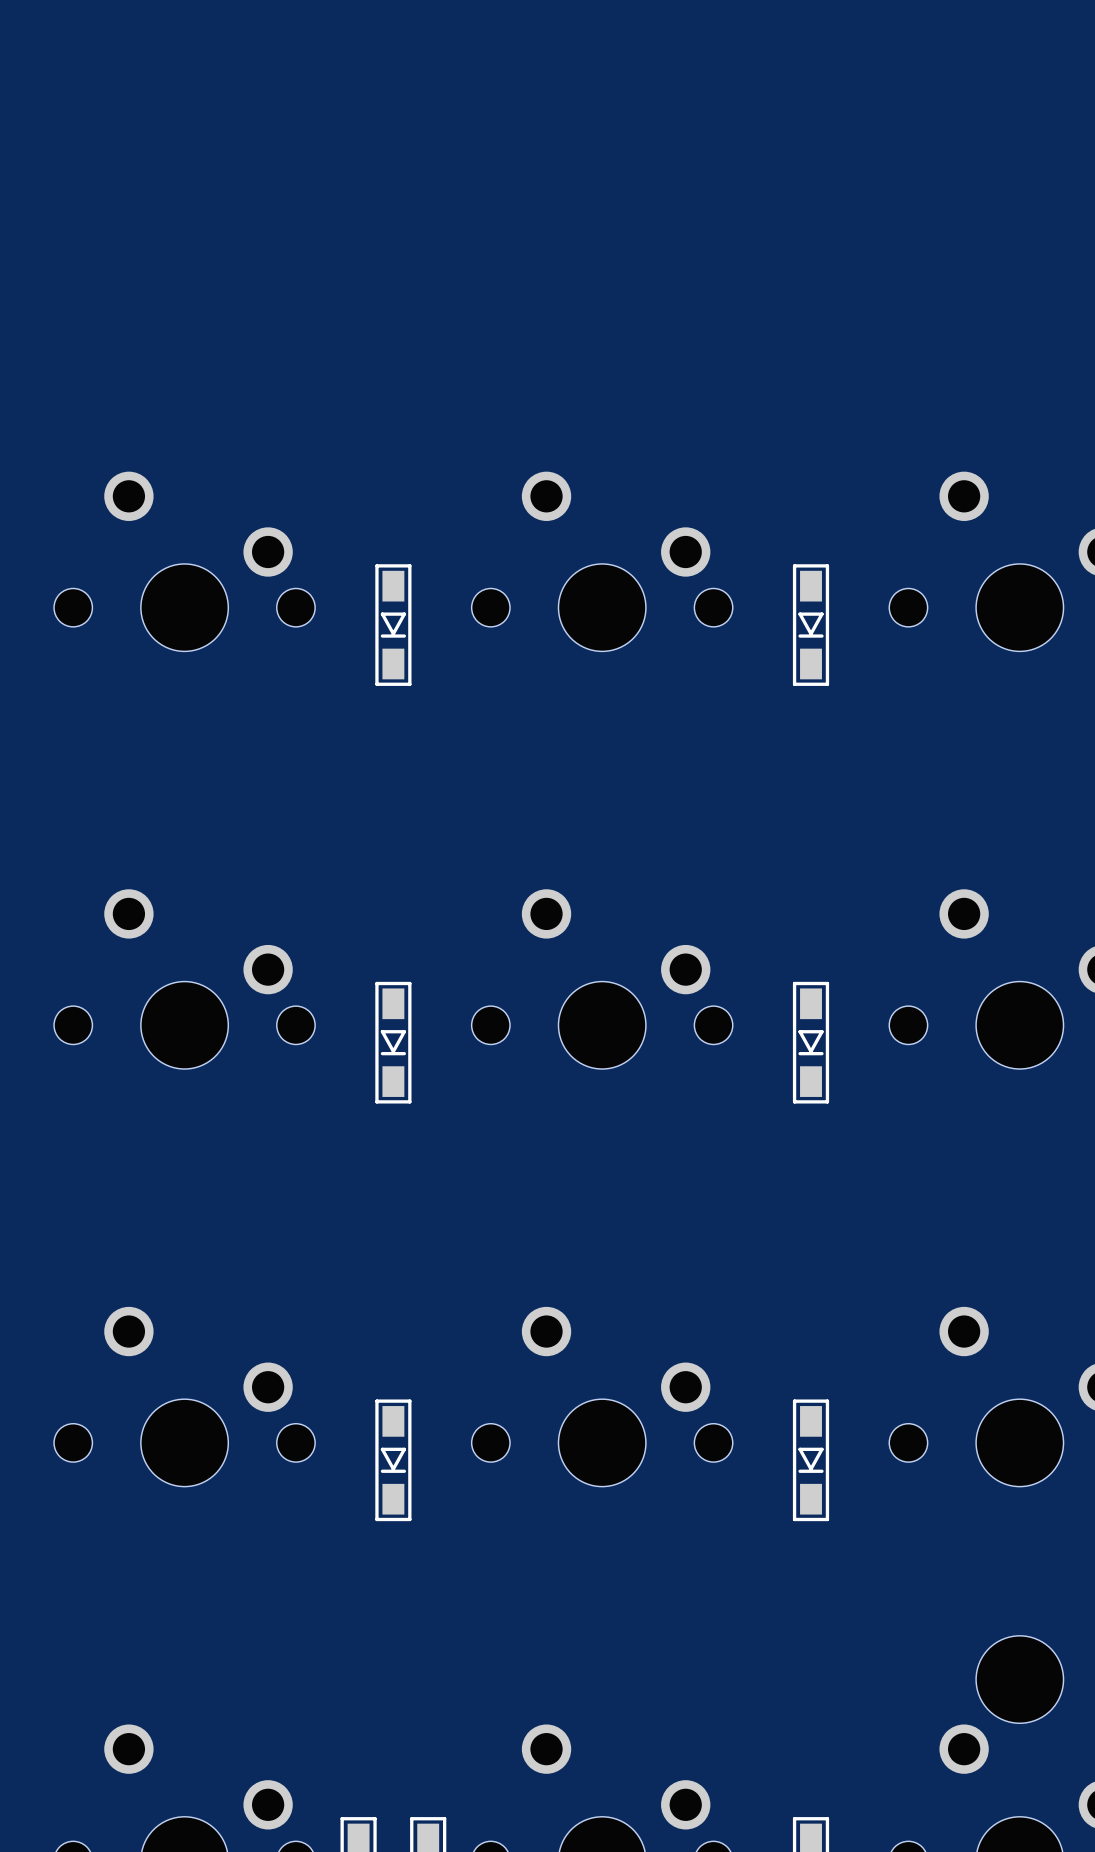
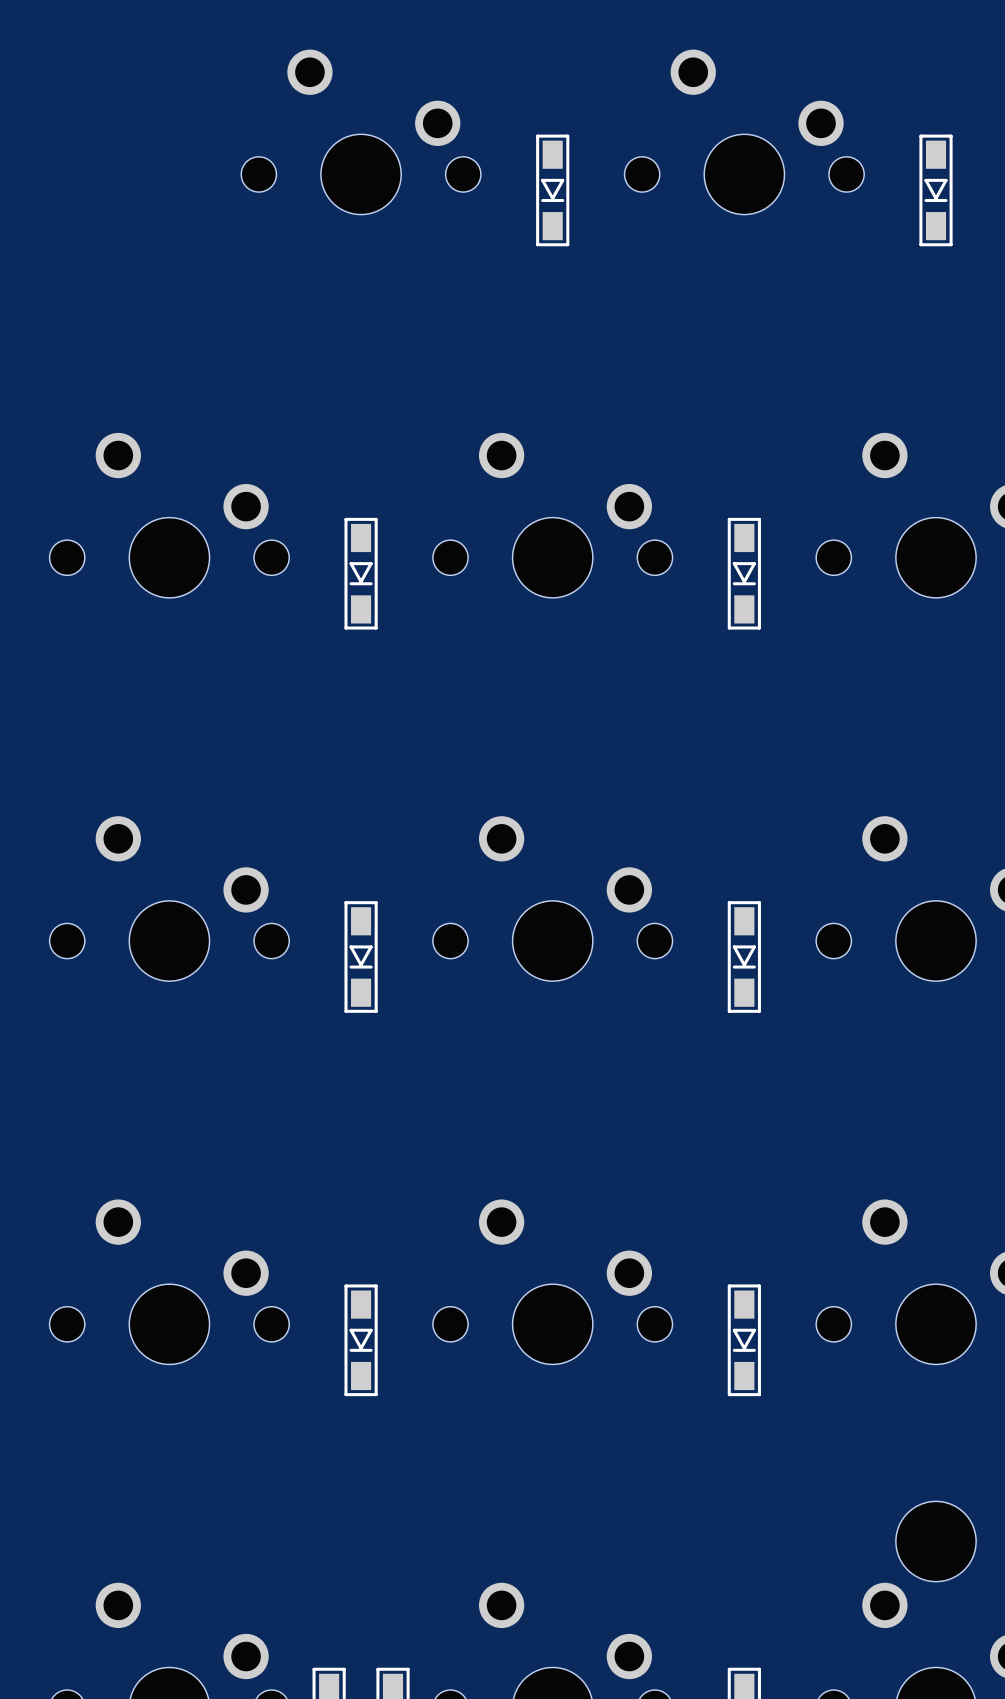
part: none -> (361, 132)
part: none -> (744, 132)
part: none -> (552, 190)
part: none -> (936, 190)

